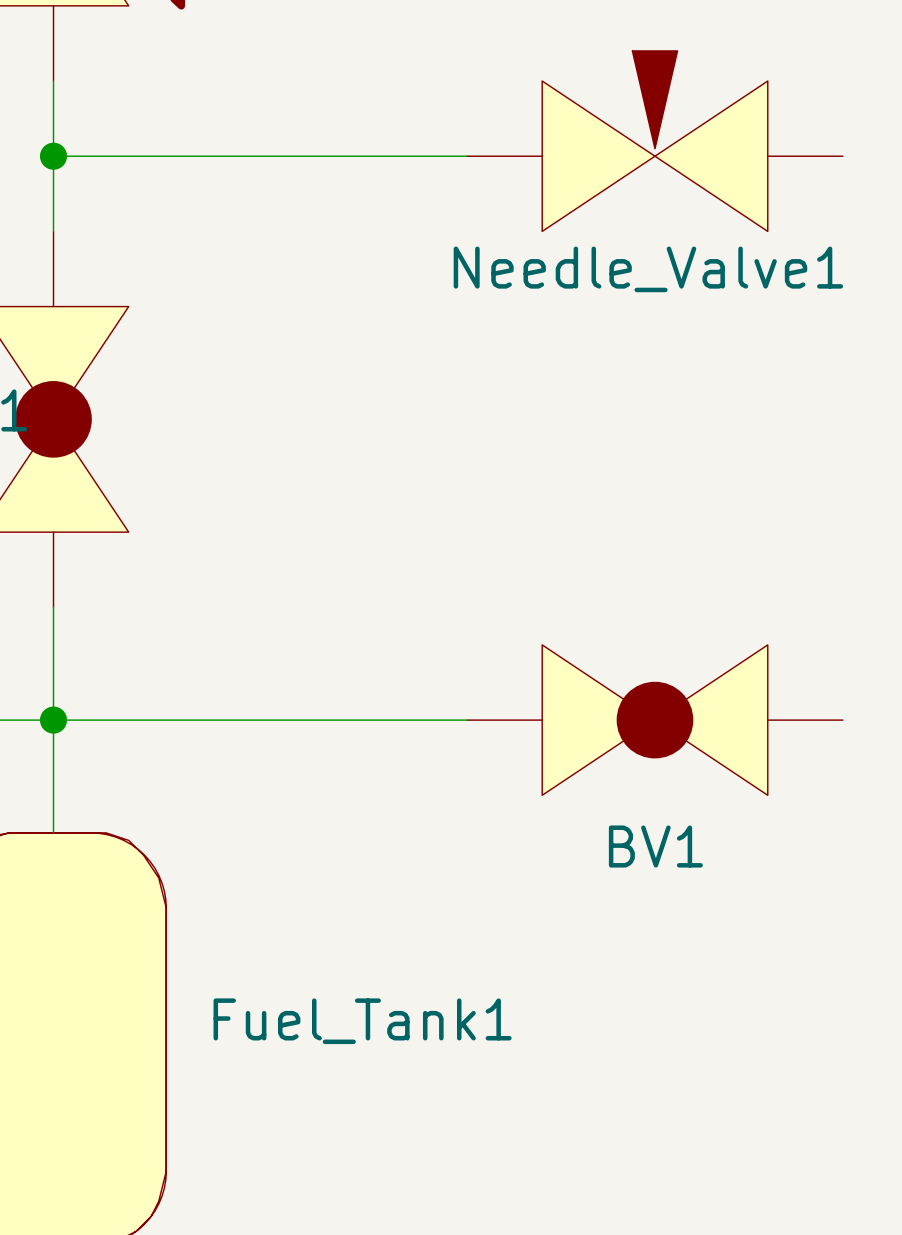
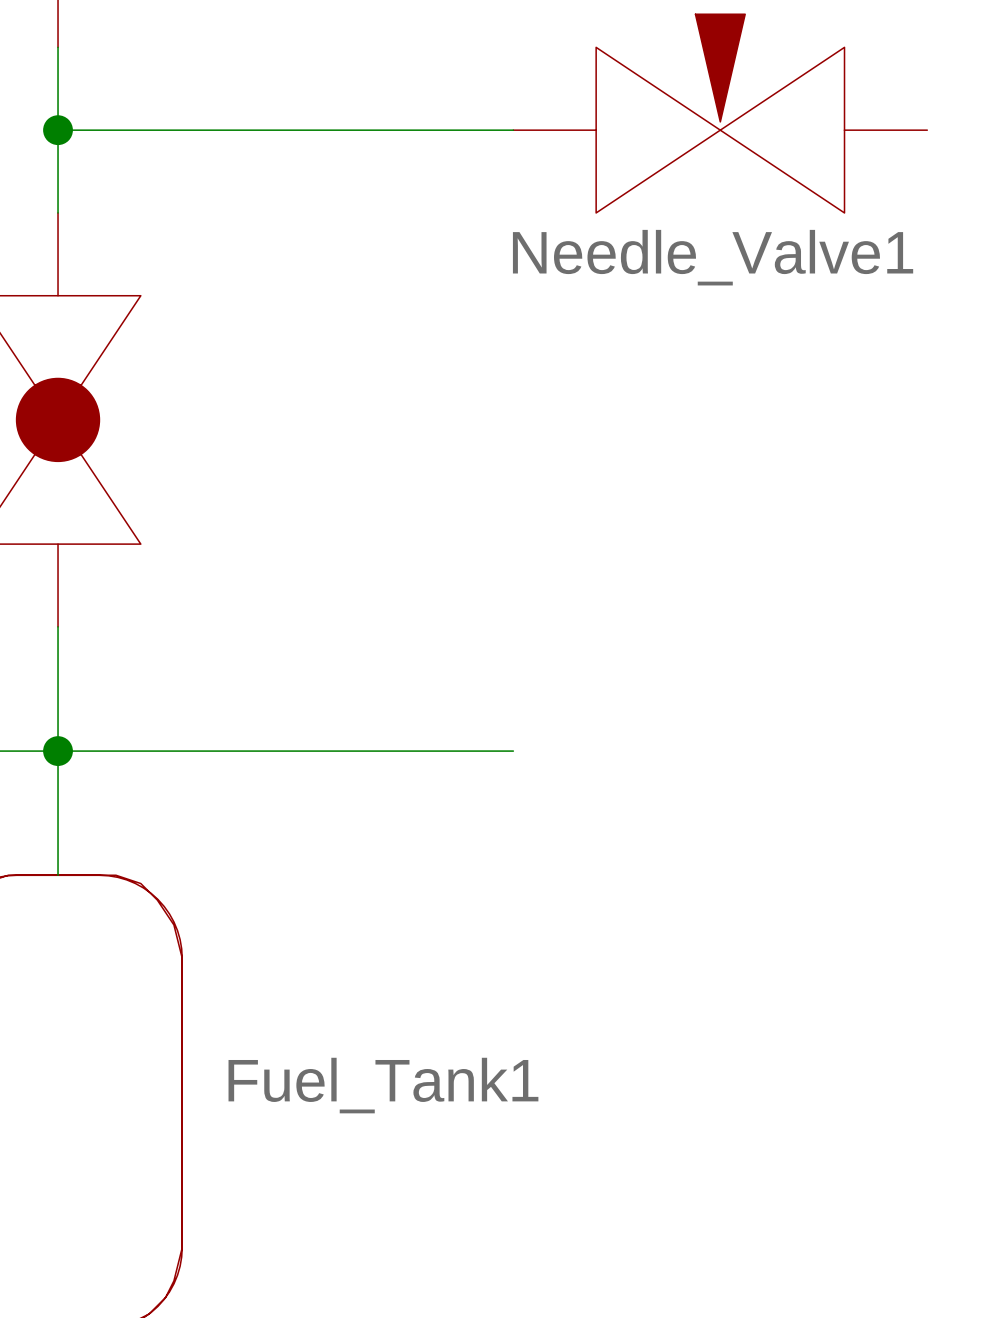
BV1: (654, 720) -> none

